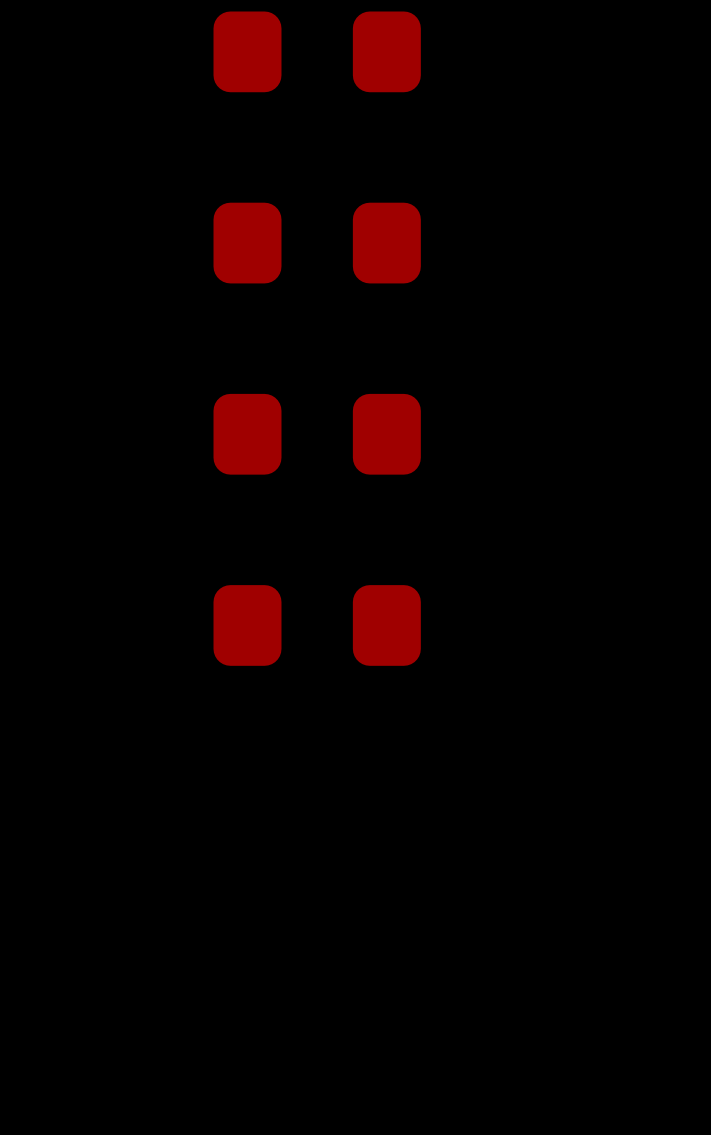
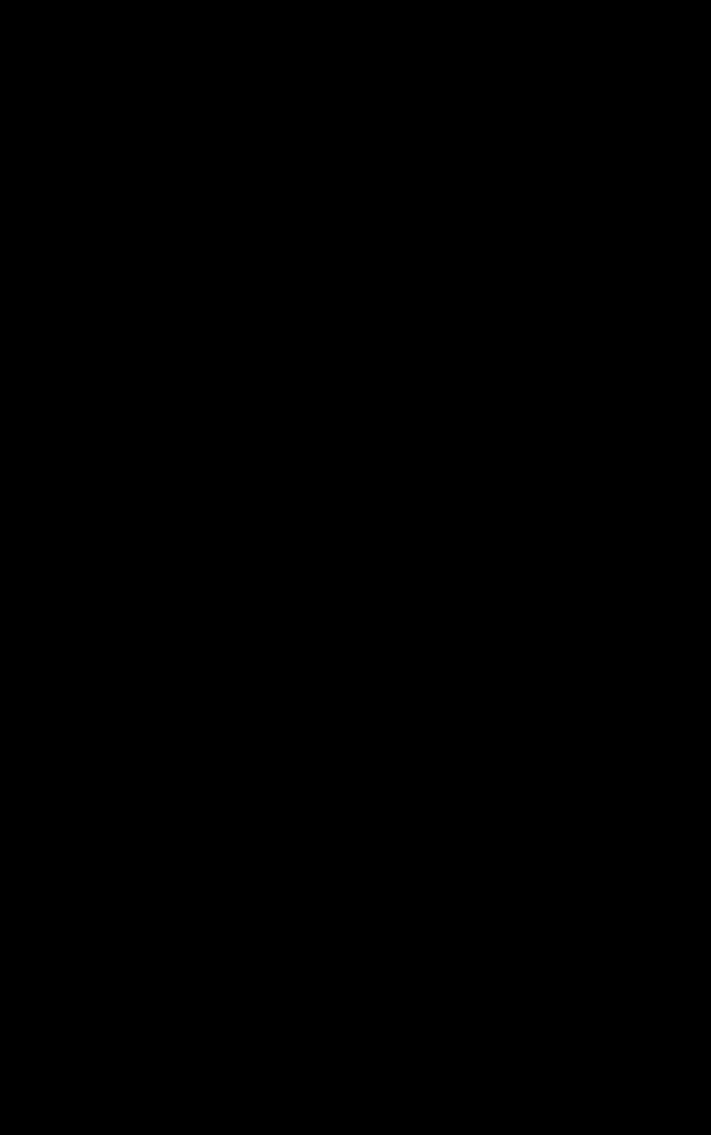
part: (317, 51) -> none
part: (317, 243) -> none
part: (317, 434) -> none
part: (317, 625) -> none

